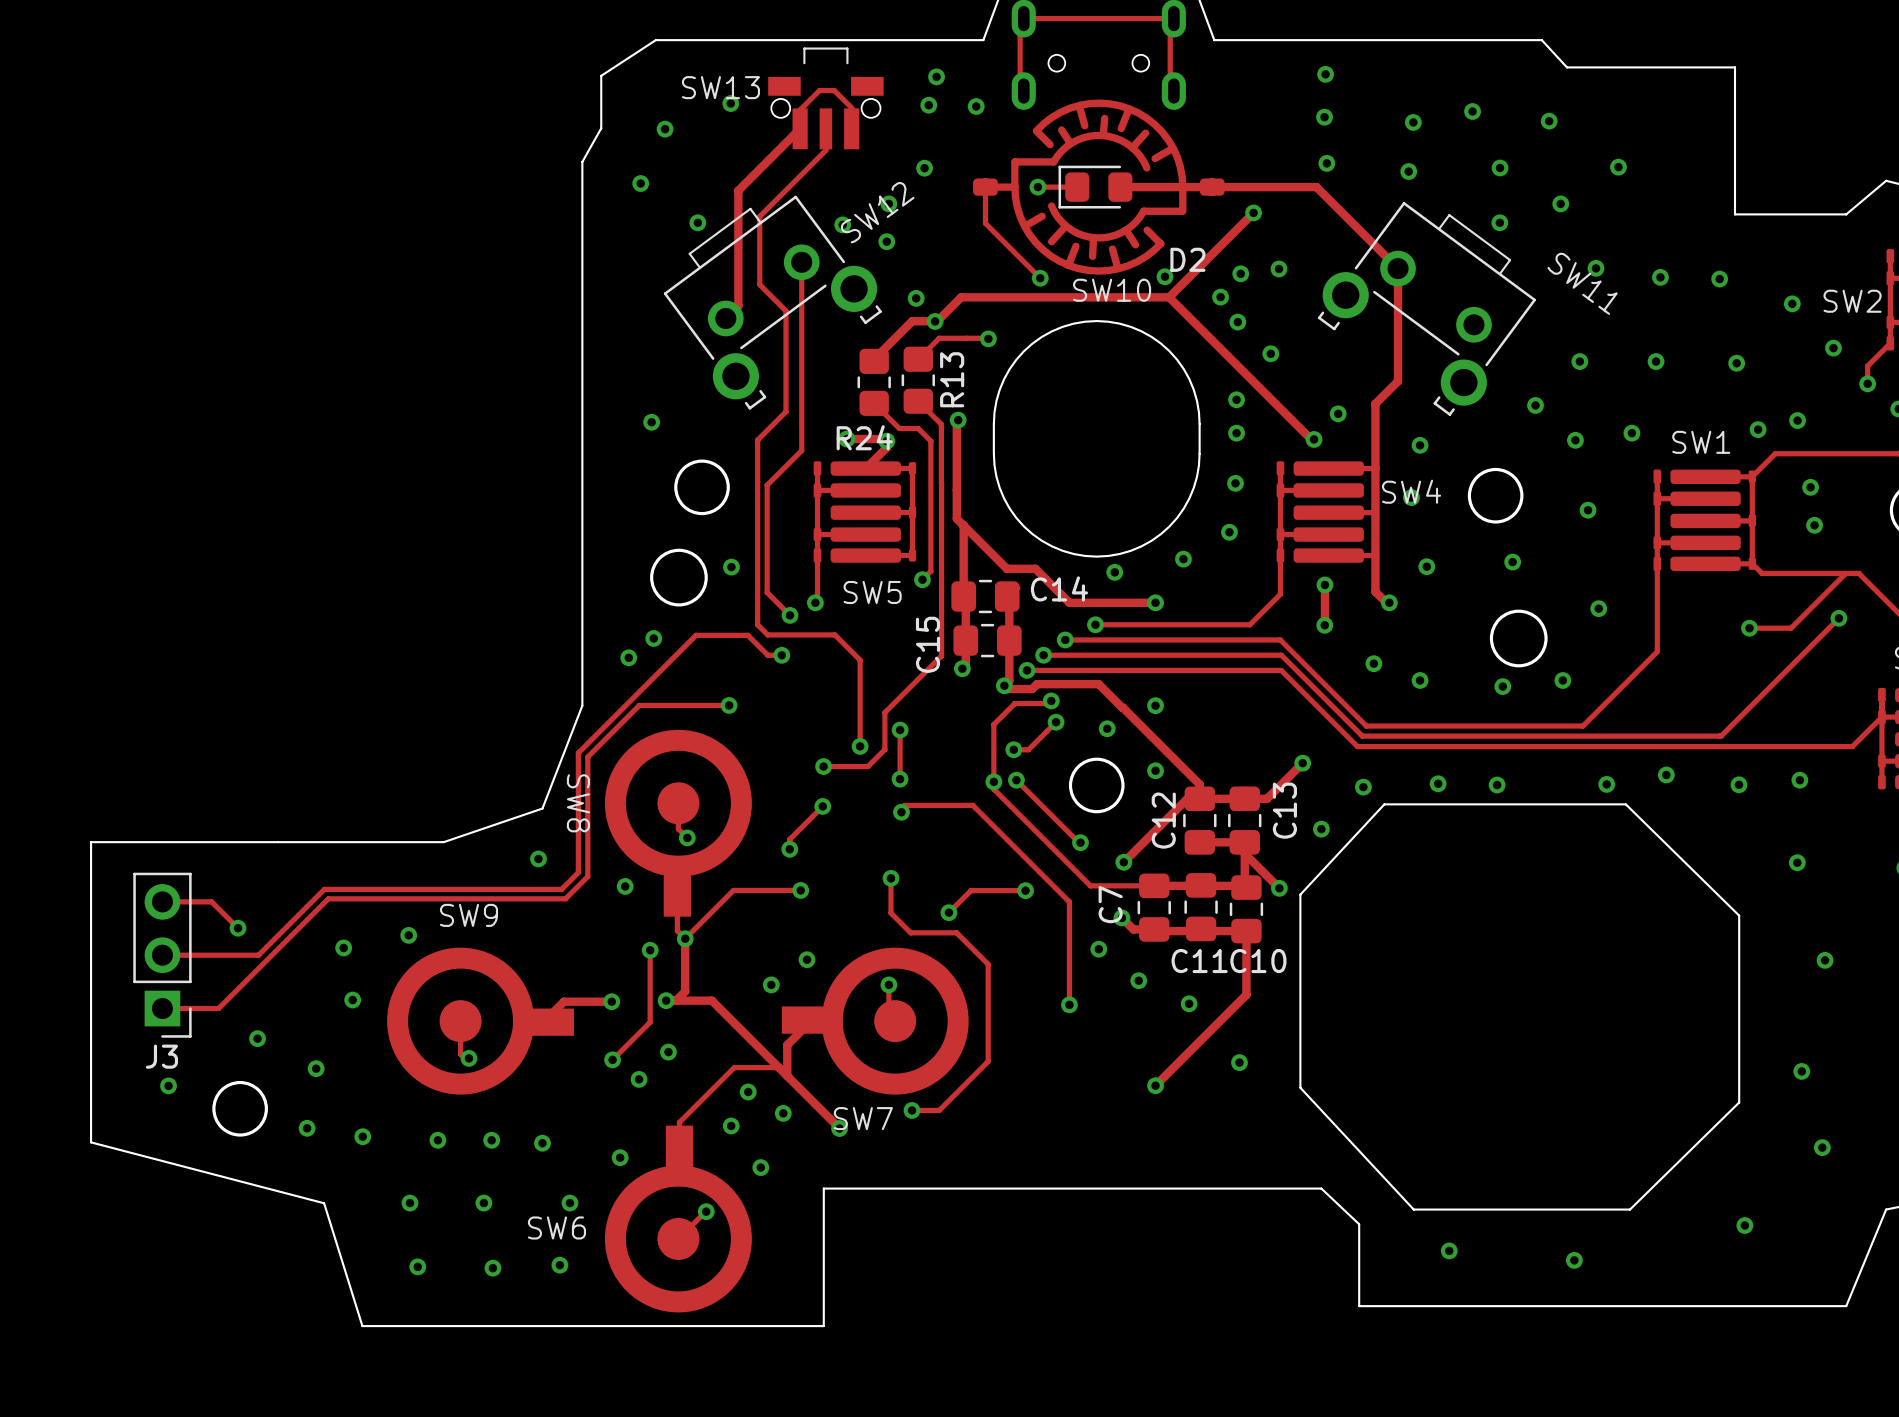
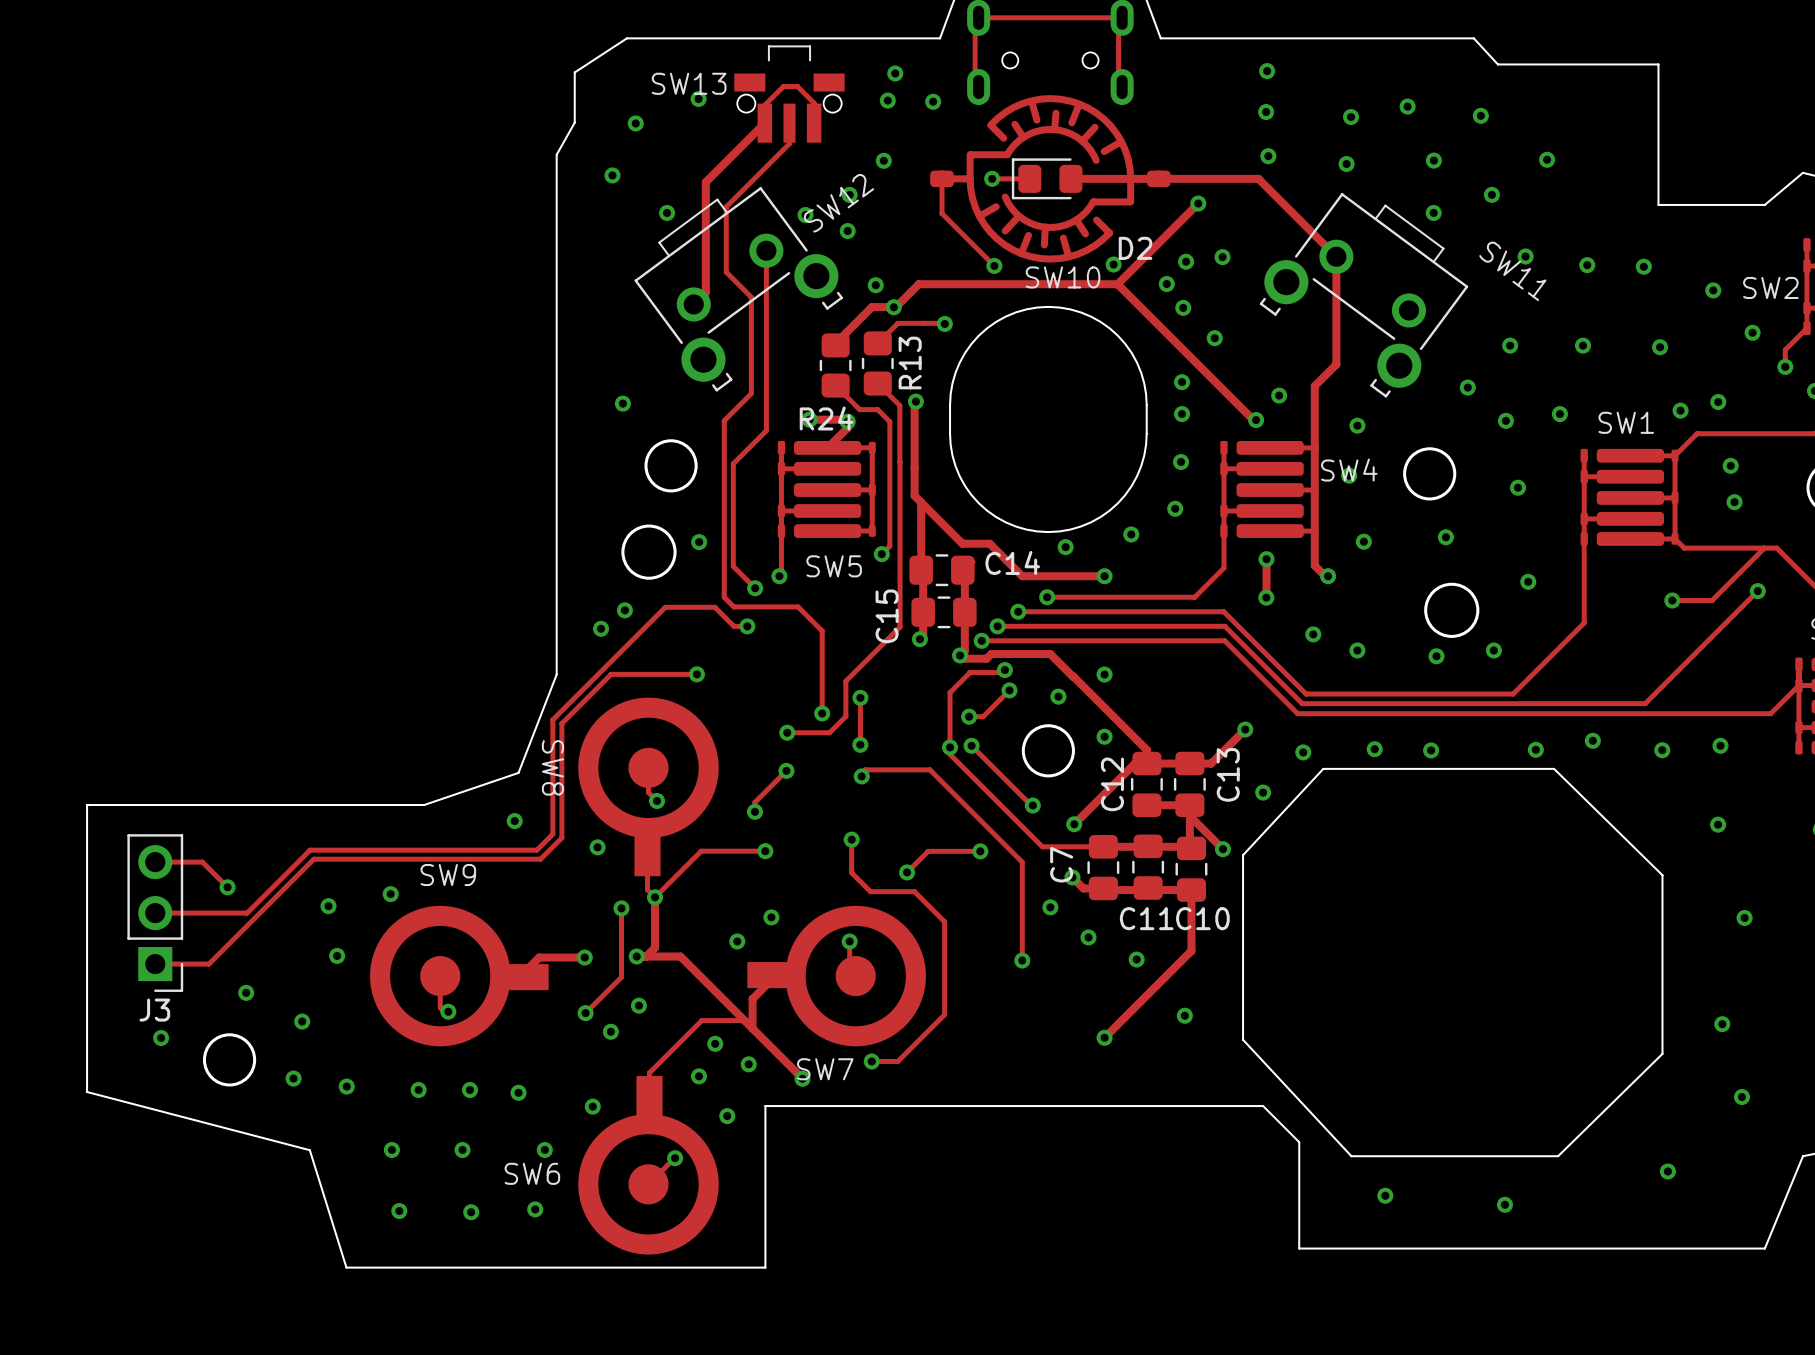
board edge: (1359, 1224) (1321, 1188) (823, 1188) (823, 1326) (800, 1326) -> (1299, 1170) (1299, 1142) (1263, 1106) (765, 1106) (765, 1267)

